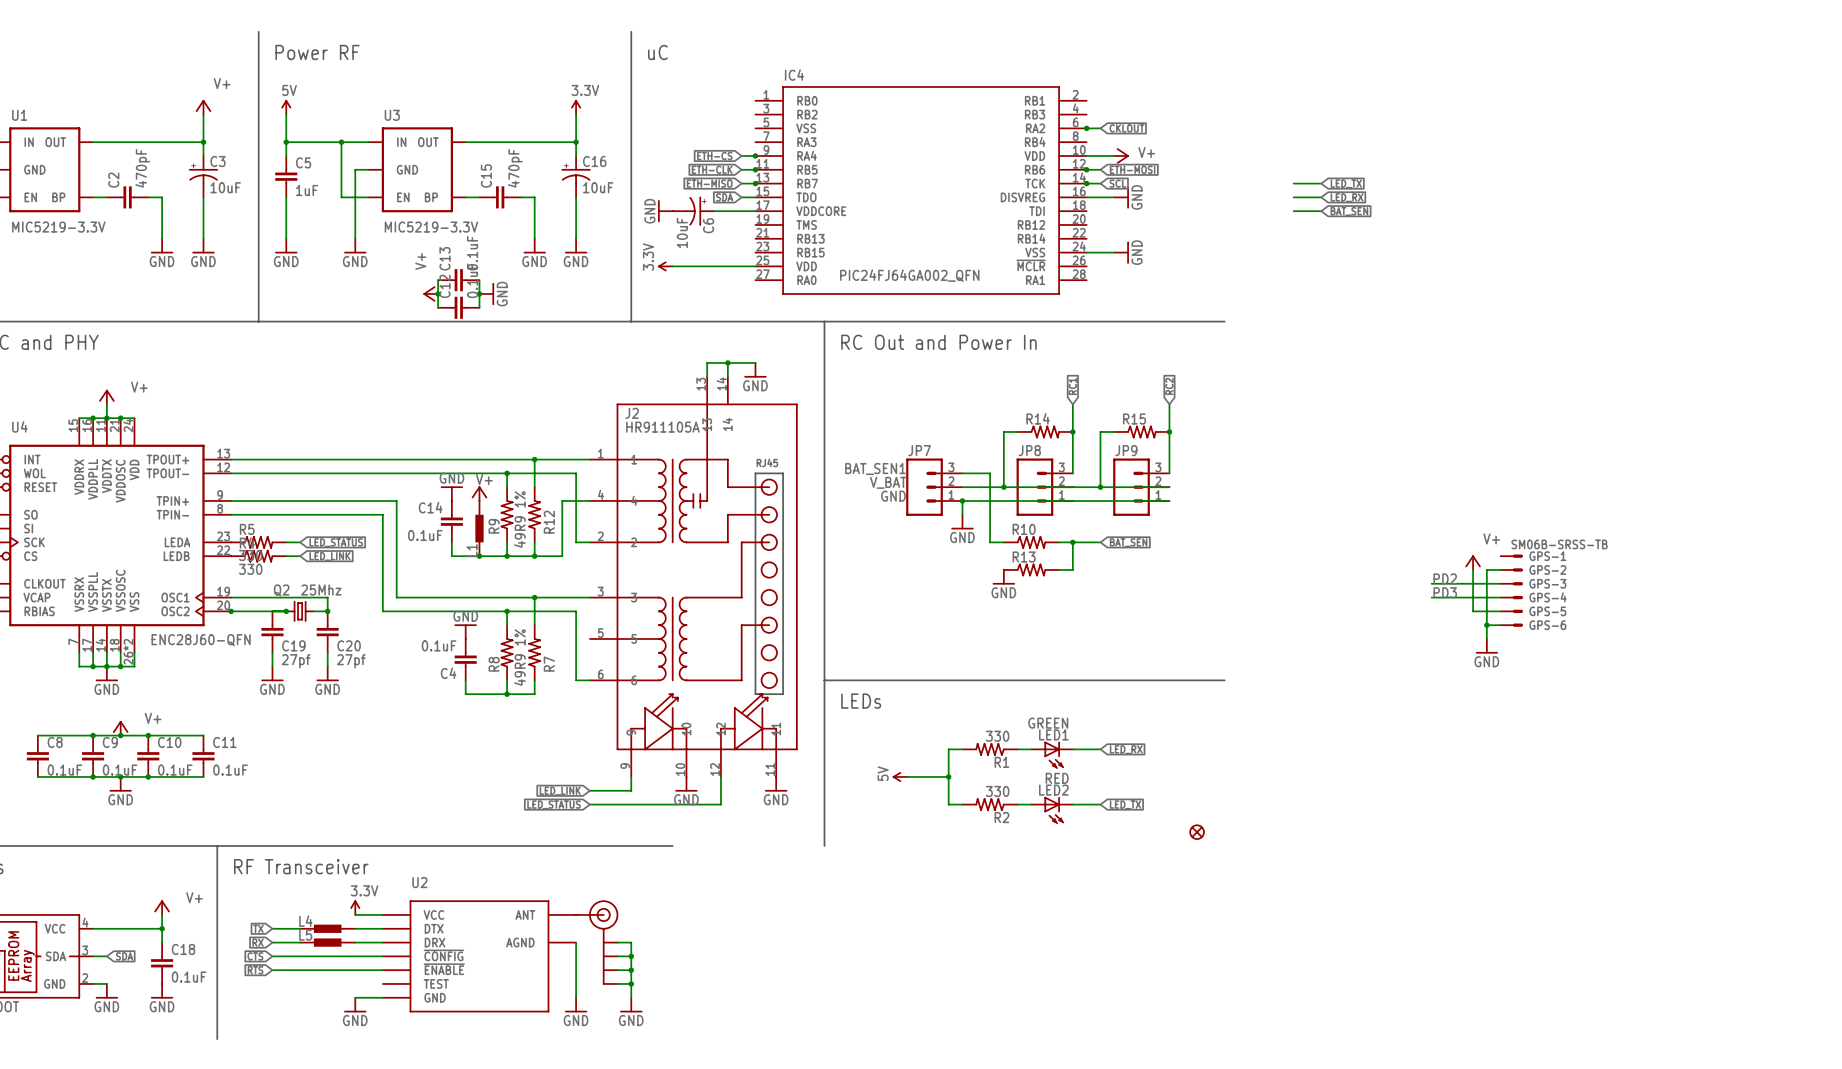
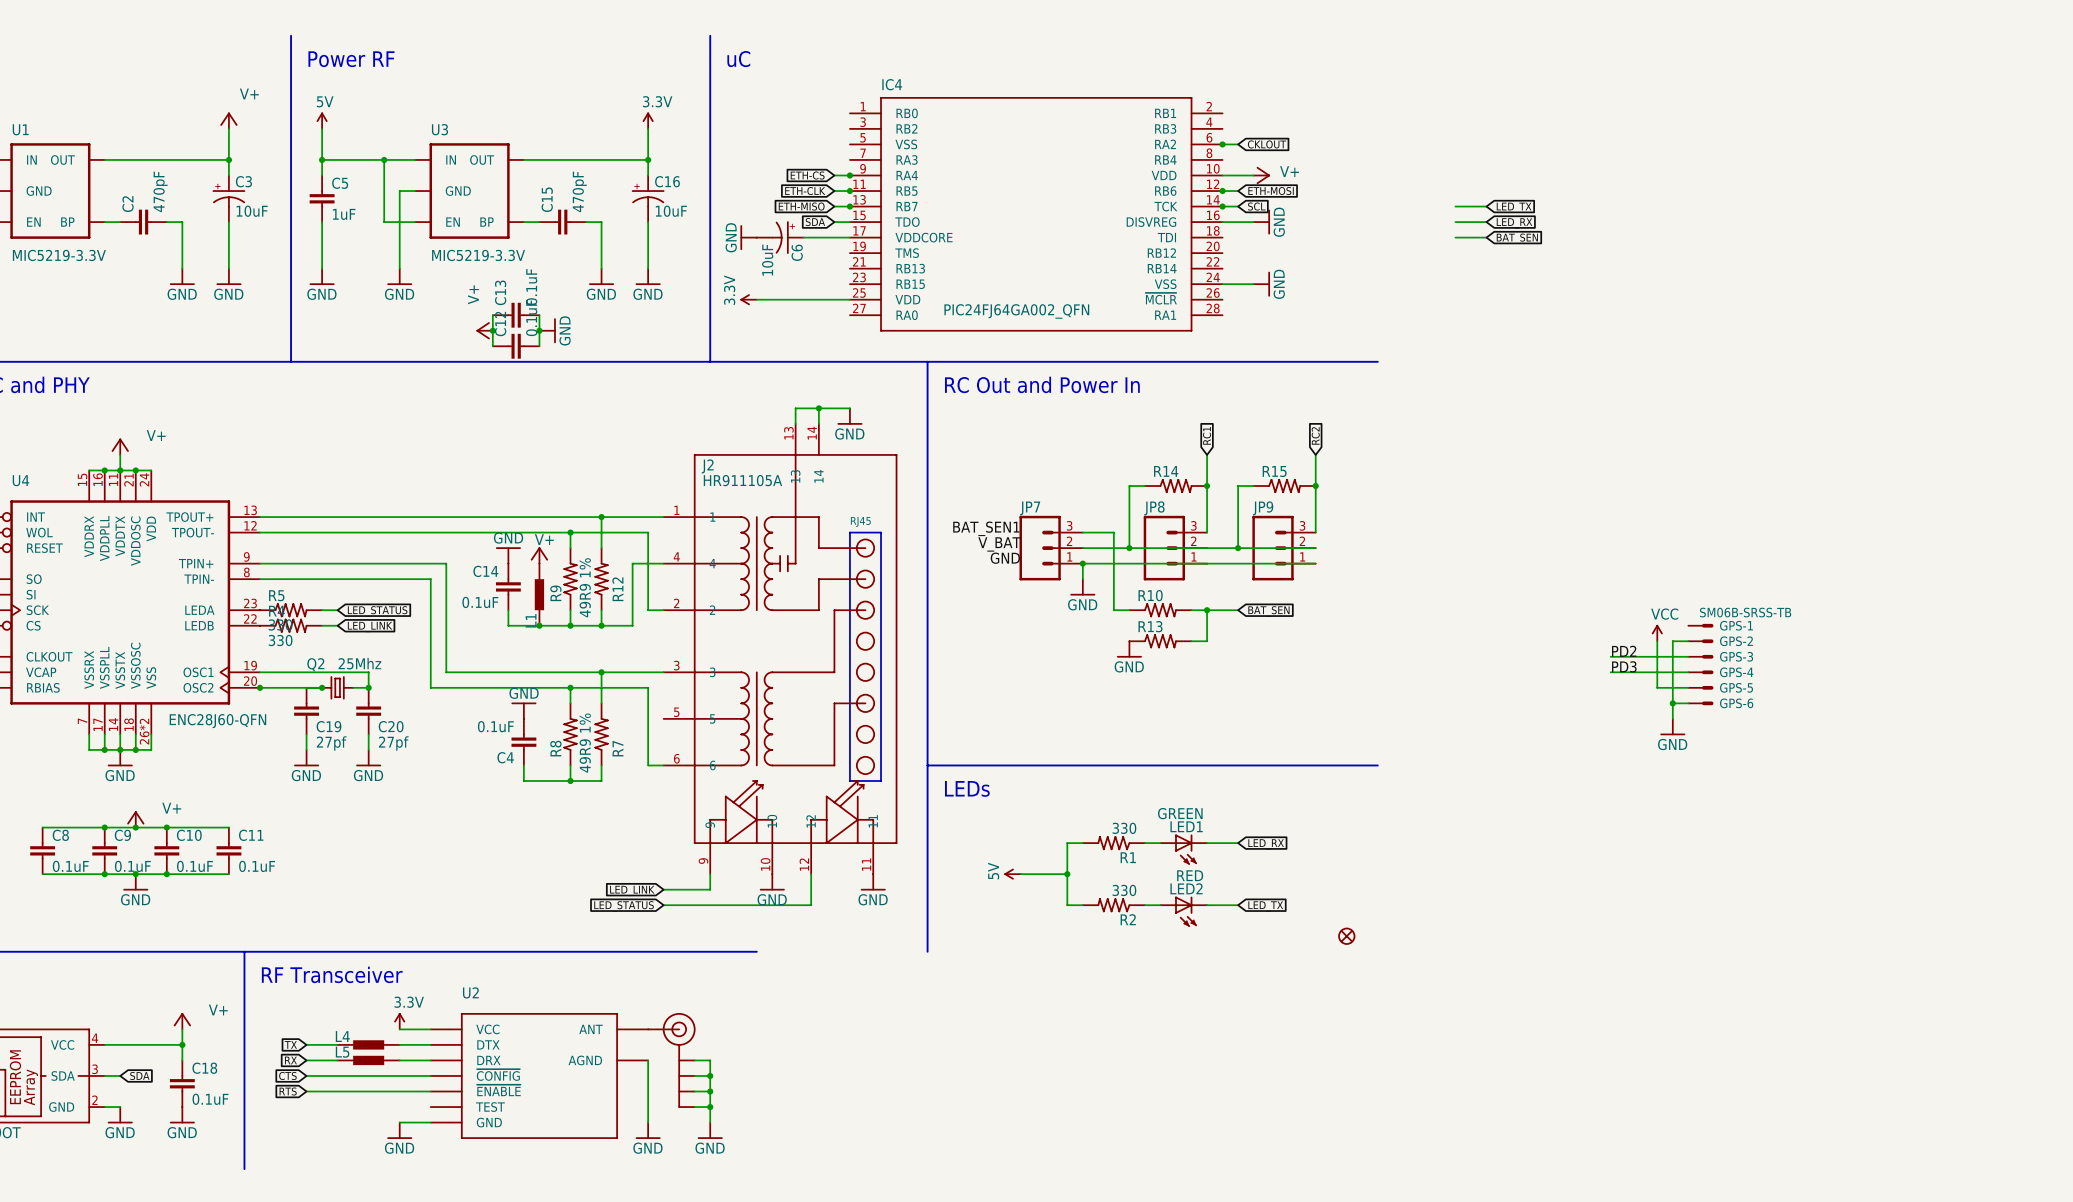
power symbol: V+ (1473, 562) -> VCC (1657, 633)

